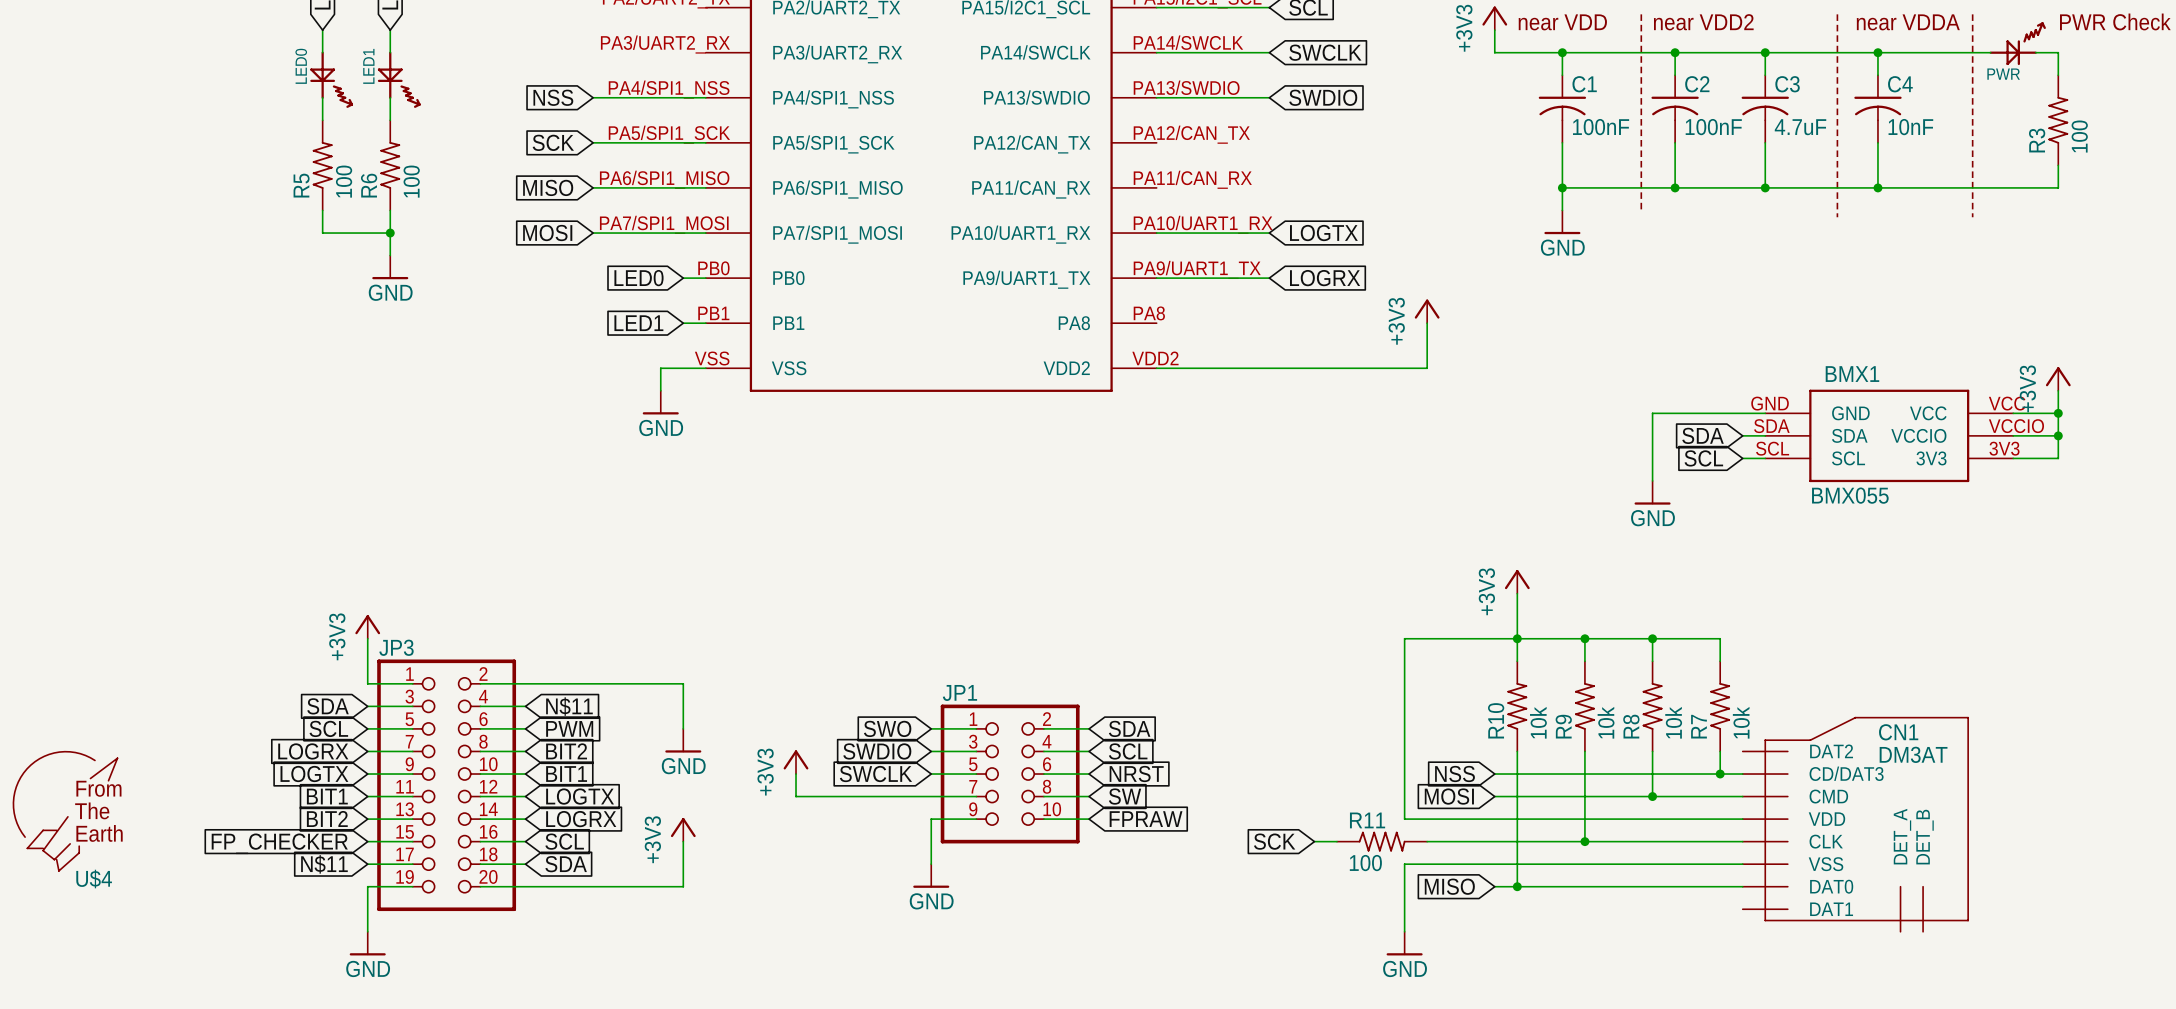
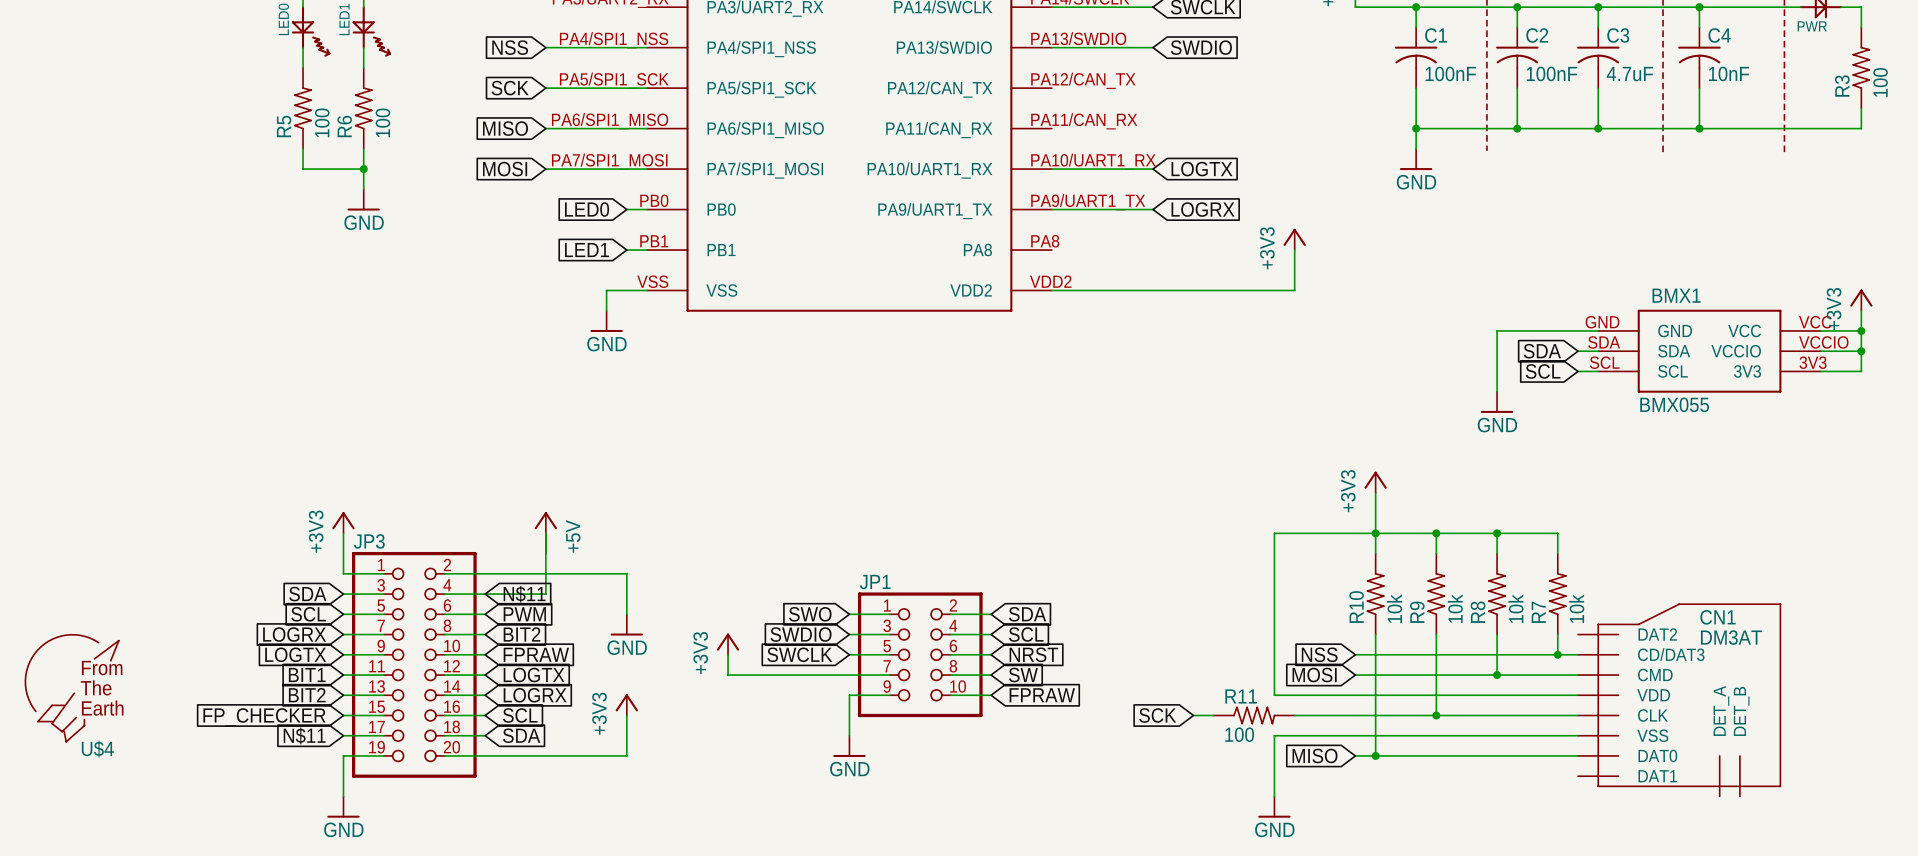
power symbol: none -> +5V (545, 522)
wire: none -> (545, 533) (545, 594) (485, 594)
global label: BIT1 (566, 774) -> FPRAW (536, 654)

